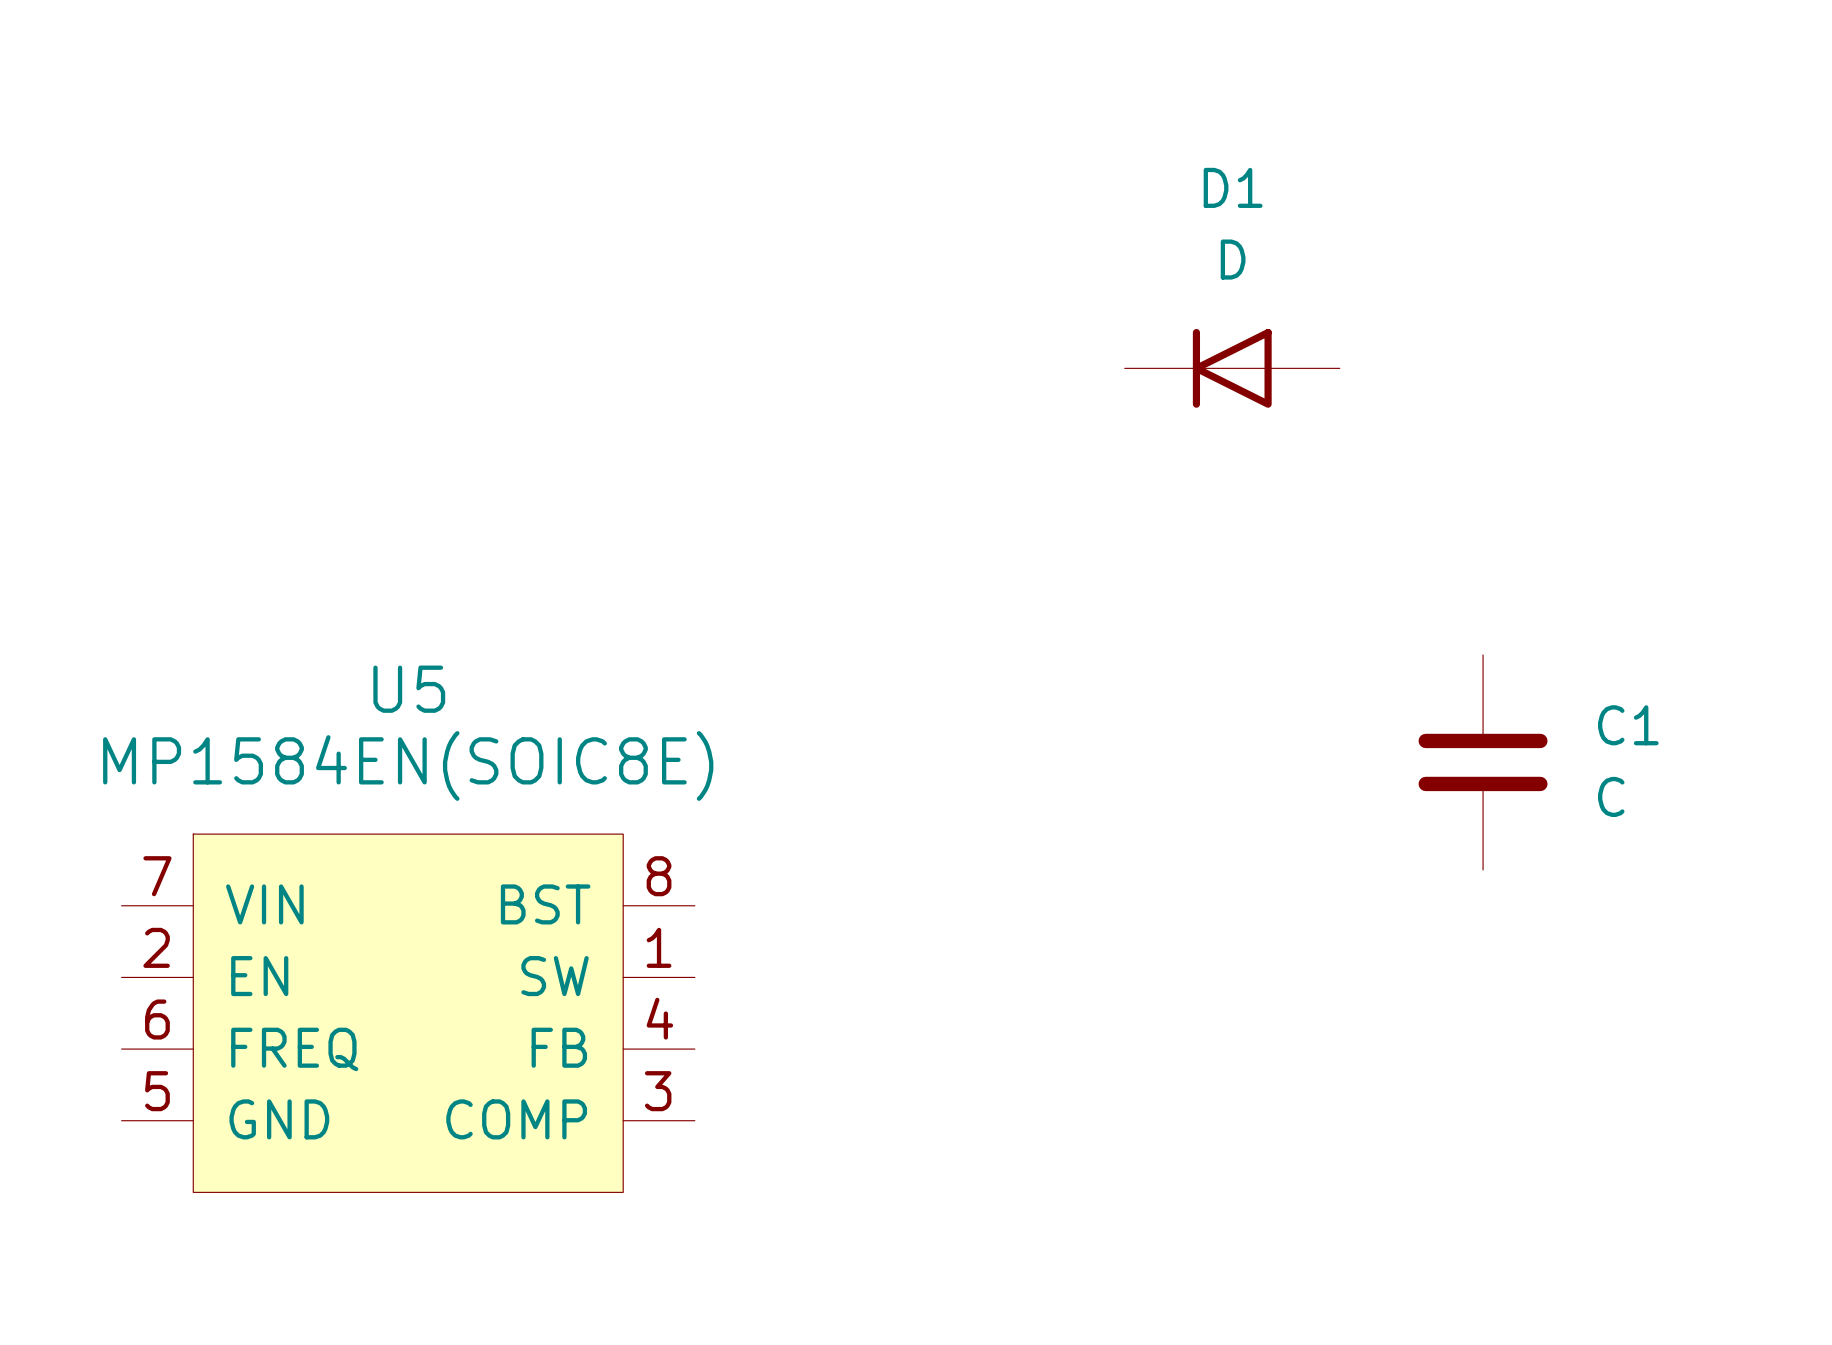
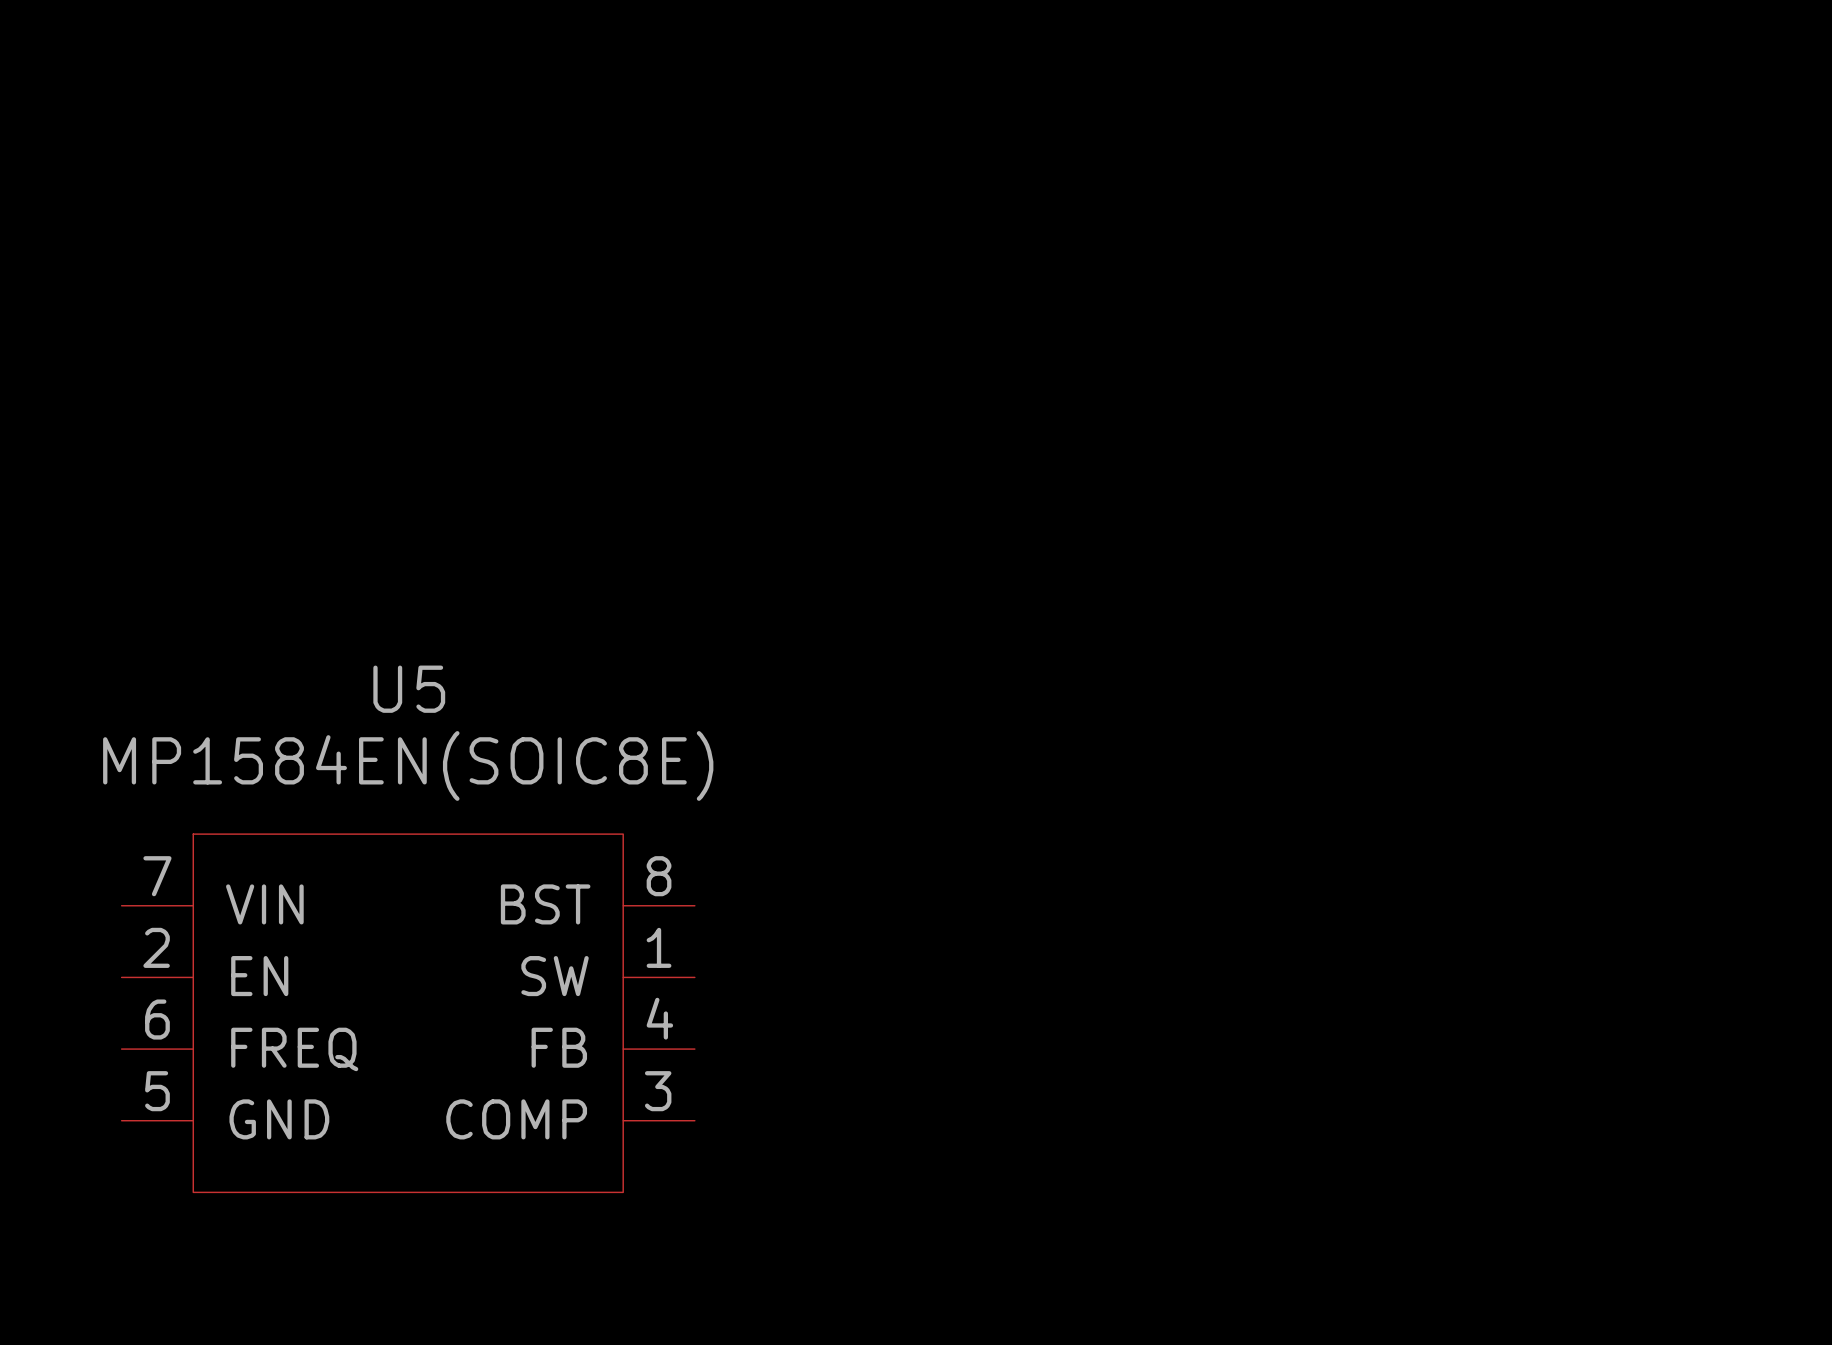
D1: D (1232, 368) -> none
C1: C (1483, 762) -> none

